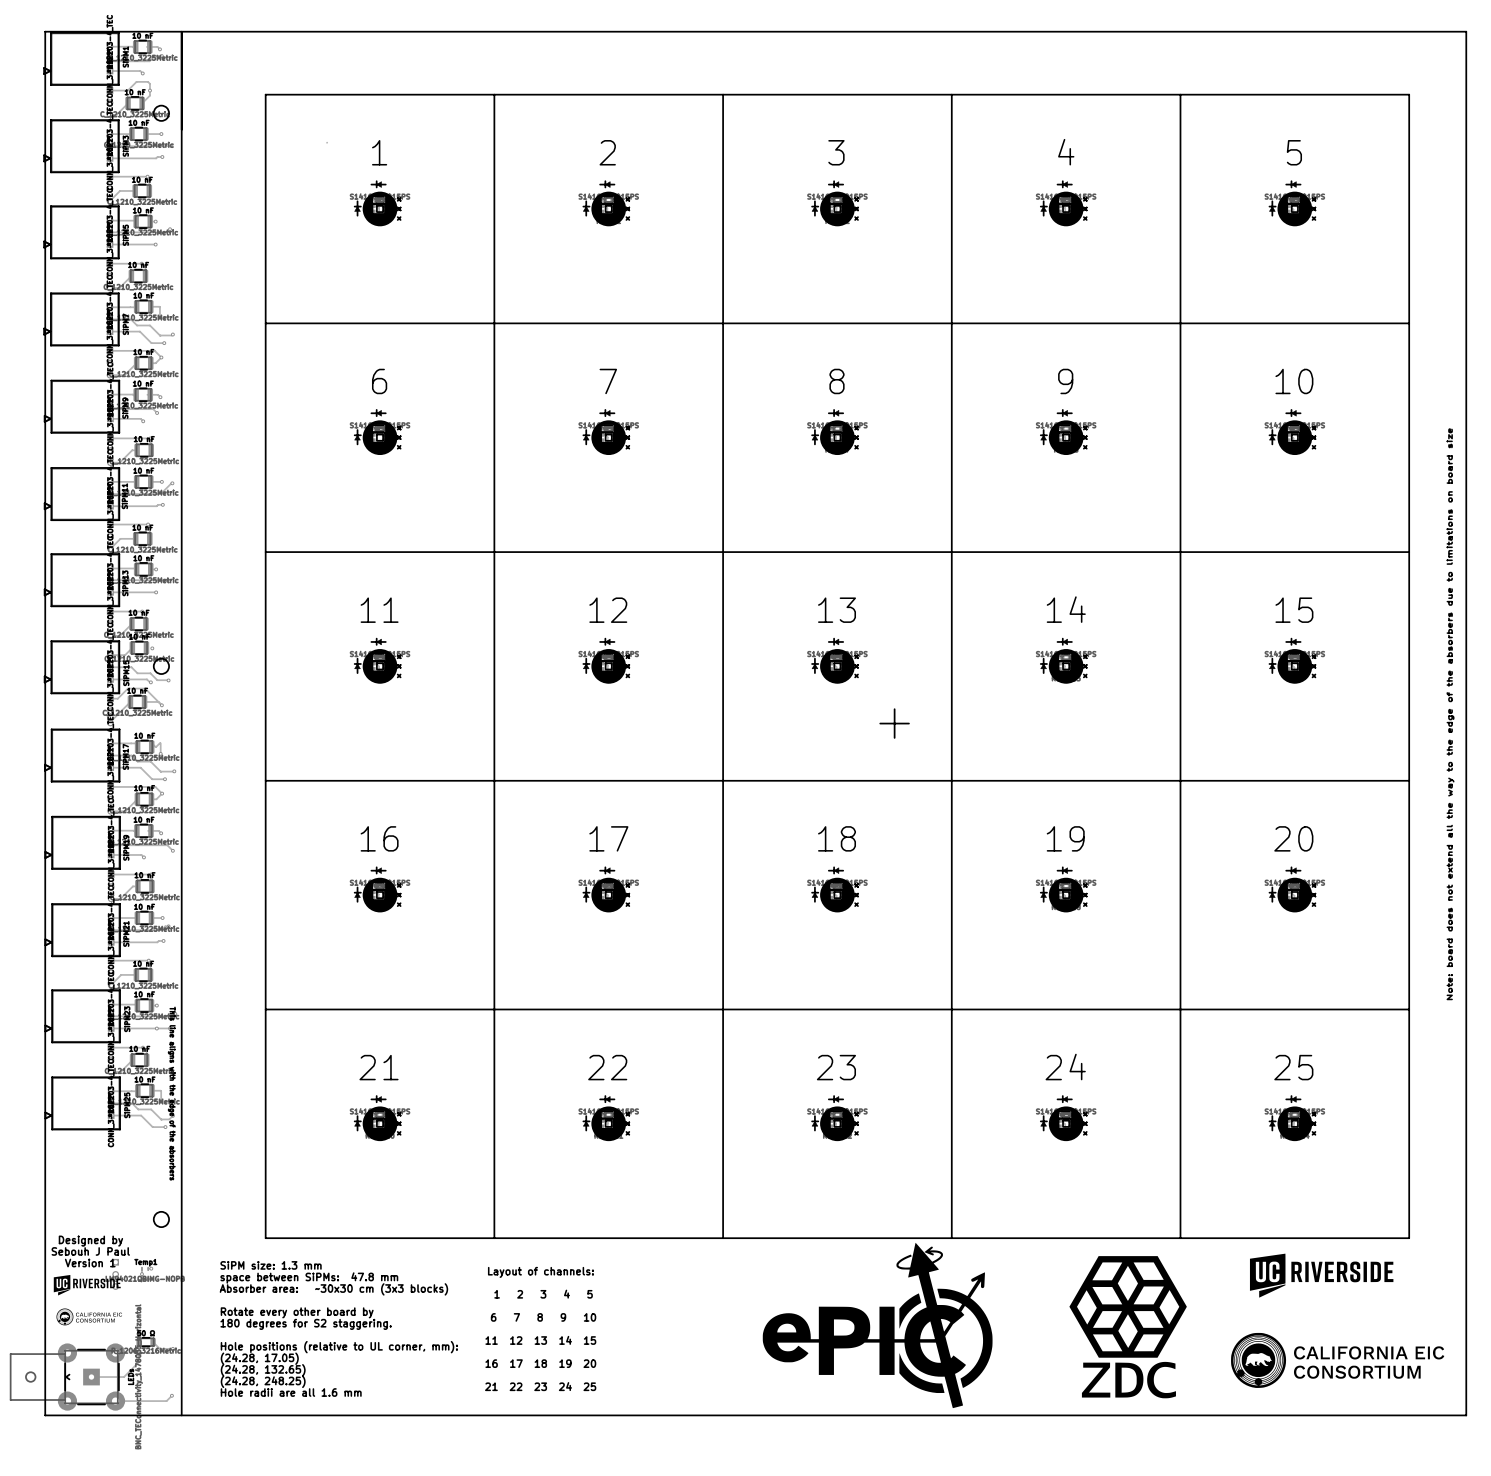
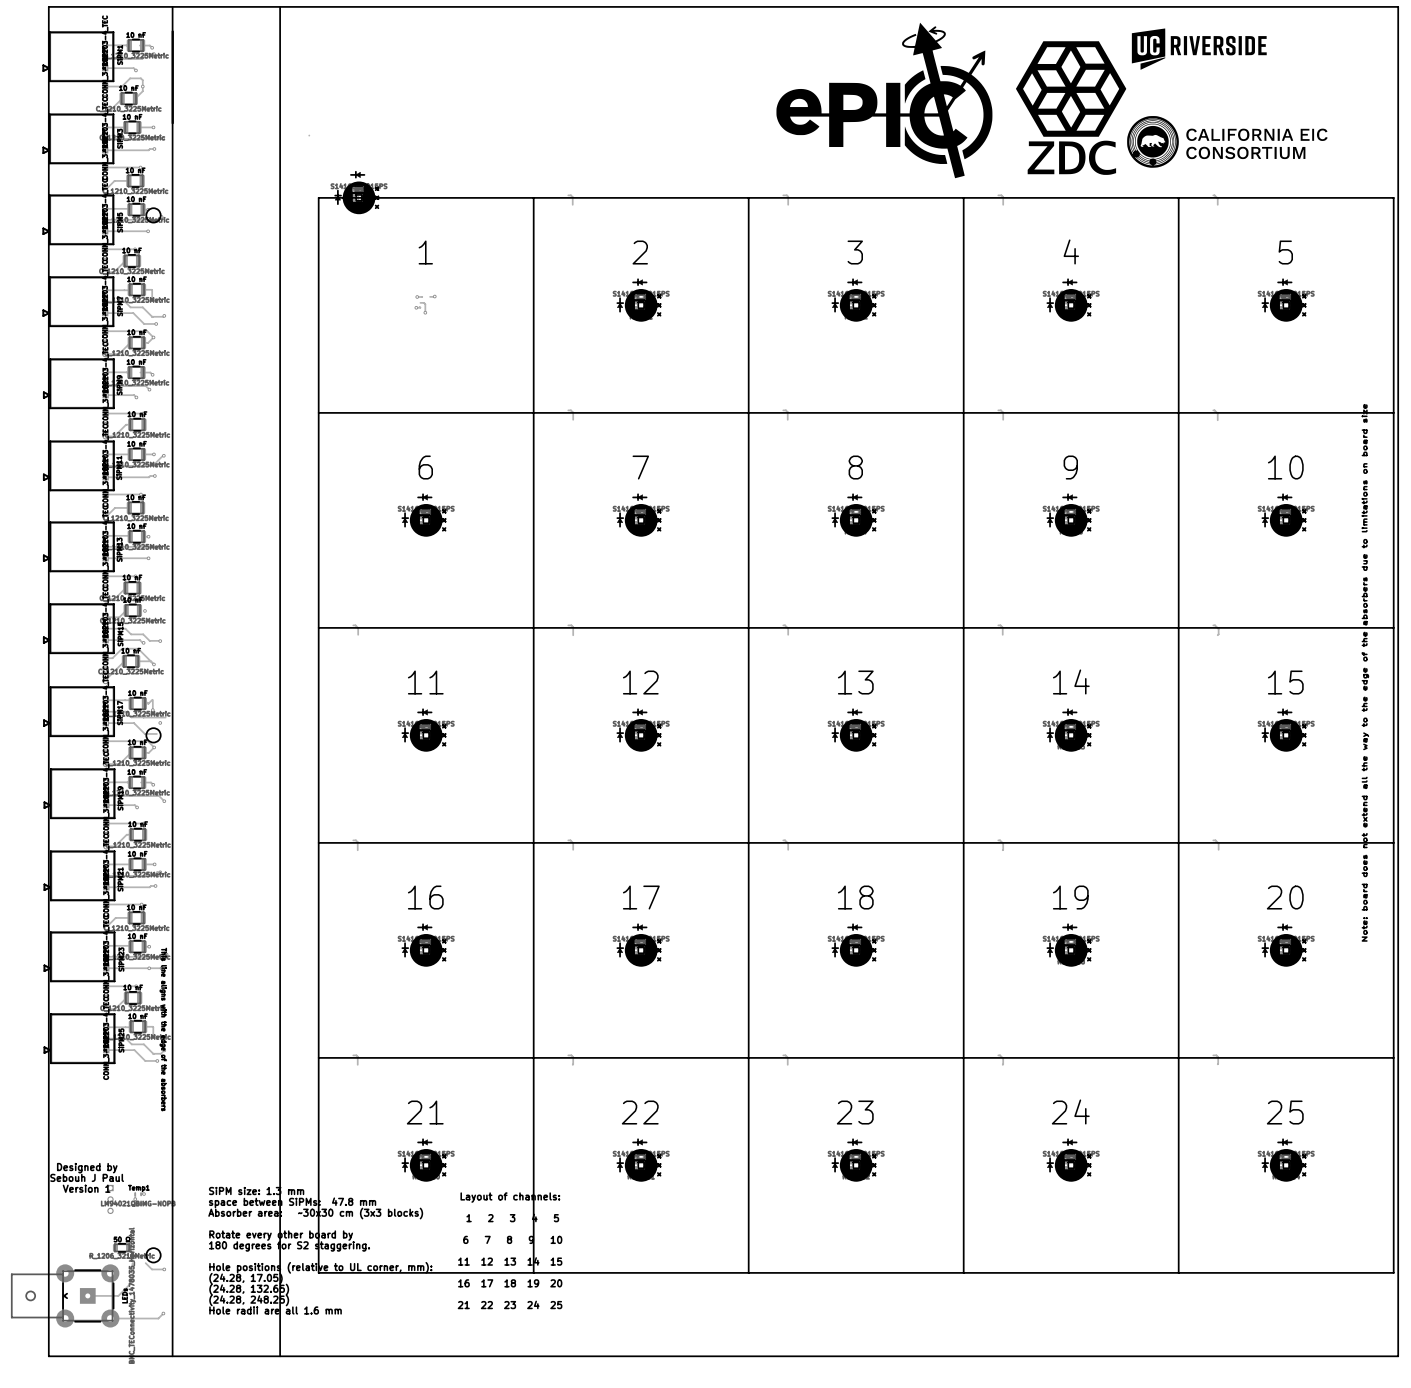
line: none -> (172, 6) (172, 31)
line: none -> (280, 6) (280, 1356)
drawing: none -> [776, 22, 993, 179]
drawing: none -> [1131, 28, 1267, 70]
board edge: (45, 31) (1466, 31) (1466, 1415) (45, 1415) (45, 31) -> (48, 6) (48, 1356) (1398, 1356) (1398, 6) (48, 6)
drawing: none -> [1015, 41, 1328, 175]
line: (265, 94) (265, 1238) (1409, 1238) (1409, 94) (265, 94) -> (318, 197) (318, 1272) (1393, 1272) (1393, 197) (318, 197)
line: (494, 94) (494, 1238) -> none
line: (723, 94) (723, 1238) -> none
line: (951, 94) (951, 1238) -> none
line: (1180, 94) (1180, 1238) -> none
round board edge position: (161, 113) -> (153, 215)
text: 1 (379, 152) -> none
text: 2 (607, 152) -> none
text: 3 (836, 152) -> none
text: 4 (1066, 152) -> none
text: 5 (1294, 152) -> none
part position: (606, 203) -> (638, 300)
part position: (835, 203) -> (853, 300)
part position: (1063, 203) -> (1068, 300)
part position: (1292, 203) -> (1283, 300)
line: none -> (533, 197) (533, 1272)
line: none -> (748, 197) (748, 1272)
line: none -> (963, 197) (963, 1272)
line: none -> (1178, 197) (1178, 1272)
text: none -> 4 (1071, 251)
text: none -> 1 (425, 252)
text: none -> 2 (640, 252)
text: none -> 3 (855, 252)
text: none -> 5 (1285, 252)
track: none -> (434, 296) (430, 296)
via: none -> (434, 296)
via: none -> (417, 296)
track: none -> (422, 296) (417, 296)
track: none -> (420, 302) (425, 304) (425, 312)
line: (265, 323) (1409, 323) -> none
track: none -> (419, 306) (420, 307)
track: none -> (416, 307) (420, 307)
via: none -> (416, 307)
via: none -> (425, 312)
text: 6 (379, 381) -> none
text: 7 (608, 381) -> none
text: 8 (837, 381) -> none
text: 9 (1065, 381) -> none
text: 10 (1294, 381) -> none
part position: (377, 432) -> (423, 515)
part position: (606, 432) -> (638, 515)
part position: (835, 432) -> (853, 515)
part position: (1063, 432) -> (1068, 515)
part position: (1292, 432) -> (1283, 515)
line: none -> (318, 412) (1393, 412)
text: none -> 6 (425, 467)
text: none -> 7 (640, 467)
text: none -> 8 (855, 467)
text: none -> 9 (1070, 467)
text: none -> 10 (1285, 467)
line: (265, 552) (1409, 552) -> none
text: 14 (1066, 609) -> none
text: 11 (379, 610) -> none
text: 12 (608, 610) -> none
text: 13 (837, 610) -> none
text: 15 (1294, 610) -> none
part position: (377, 660) -> (423, 730)
part position: (606, 660) -> (638, 730)
part position: (835, 660) -> (853, 730)
part position: (1063, 660) -> (1068, 730)
part position: (1292, 660) -> (1283, 730)
round board edge position: (161, 666) -> (153, 735)
line: none -> (318, 627) (1393, 627)
line: (894, 709) (894, 737) -> none
line: (880, 723) (908, 723) -> none
text: none -> 14 (1071, 681)
text: none -> 11 (425, 682)
text: none -> 12 (640, 682)
text: none -> 13 (855, 682)
text: none -> 15 (1285, 682)
track: (150, 761) (161, 772) -> (143, 717) (165, 717)
via: none -> (160, 722)
track: (174, 771) (160, 771) -> none
via: (174, 771) -> none
via: (165, 779) -> none
line: (265, 780) (1409, 780) -> none
text: 16 (379, 838) -> none
text: 17 (608, 838) -> none
text: 18 (837, 838) -> none
text: 19 (1065, 838) -> none
text: 20 (1293, 838) -> none
part position: (377, 889) -> (423, 945)
part position: (606, 889) -> (638, 945)
part position: (835, 889) -> (853, 945)
part position: (1063, 889) -> (1068, 945)
part position: (1292, 889) -> (1283, 945)
line: none -> (318, 842) (1393, 842)
text: none -> 16 (425, 897)
text: none -> 17 (641, 897)
text: none -> 18 (855, 897)
text: none -> 19 (1070, 897)
text: none -> 20 (1285, 897)
line: (265, 1009) (1409, 1009) -> none
text: 21 (379, 1067) -> none
text: 22 (607, 1067) -> none
text: 23 (836, 1067) -> none
text: 24 (1065, 1067) -> none
text: 25 (1293, 1067) -> none
part position: (377, 1118) -> (423, 1160)
part position: (606, 1118) -> (638, 1160)
part position: (835, 1118) -> (853, 1160)
part position: (1063, 1118) -> (1068, 1160)
part position: (1292, 1118) -> (1283, 1160)
line: none -> (318, 1057) (1393, 1057)
text: none -> 21 (425, 1112)
text: none -> 22 (640, 1112)
text: none -> 23 (855, 1112)
text: none -> 24 (1070, 1111)
text: none -> 25 (1285, 1112)
round board edge position: (161, 1219) -> (153, 1255)
drawing: [762, 1242, 993, 1409] -> none
drawing: [1249, 1253, 1394, 1298] -> none
drawing: [1069, 1256, 1187, 1399] -> none
drawing: [53, 1274, 121, 1296] -> none
drawing: [56, 1308, 123, 1326] -> none
drawing: [1231, 1332, 1445, 1388] -> none
part position: (146, 1342) -> (122, 1247)
line: none -> (172, 1332) (172, 1356)

